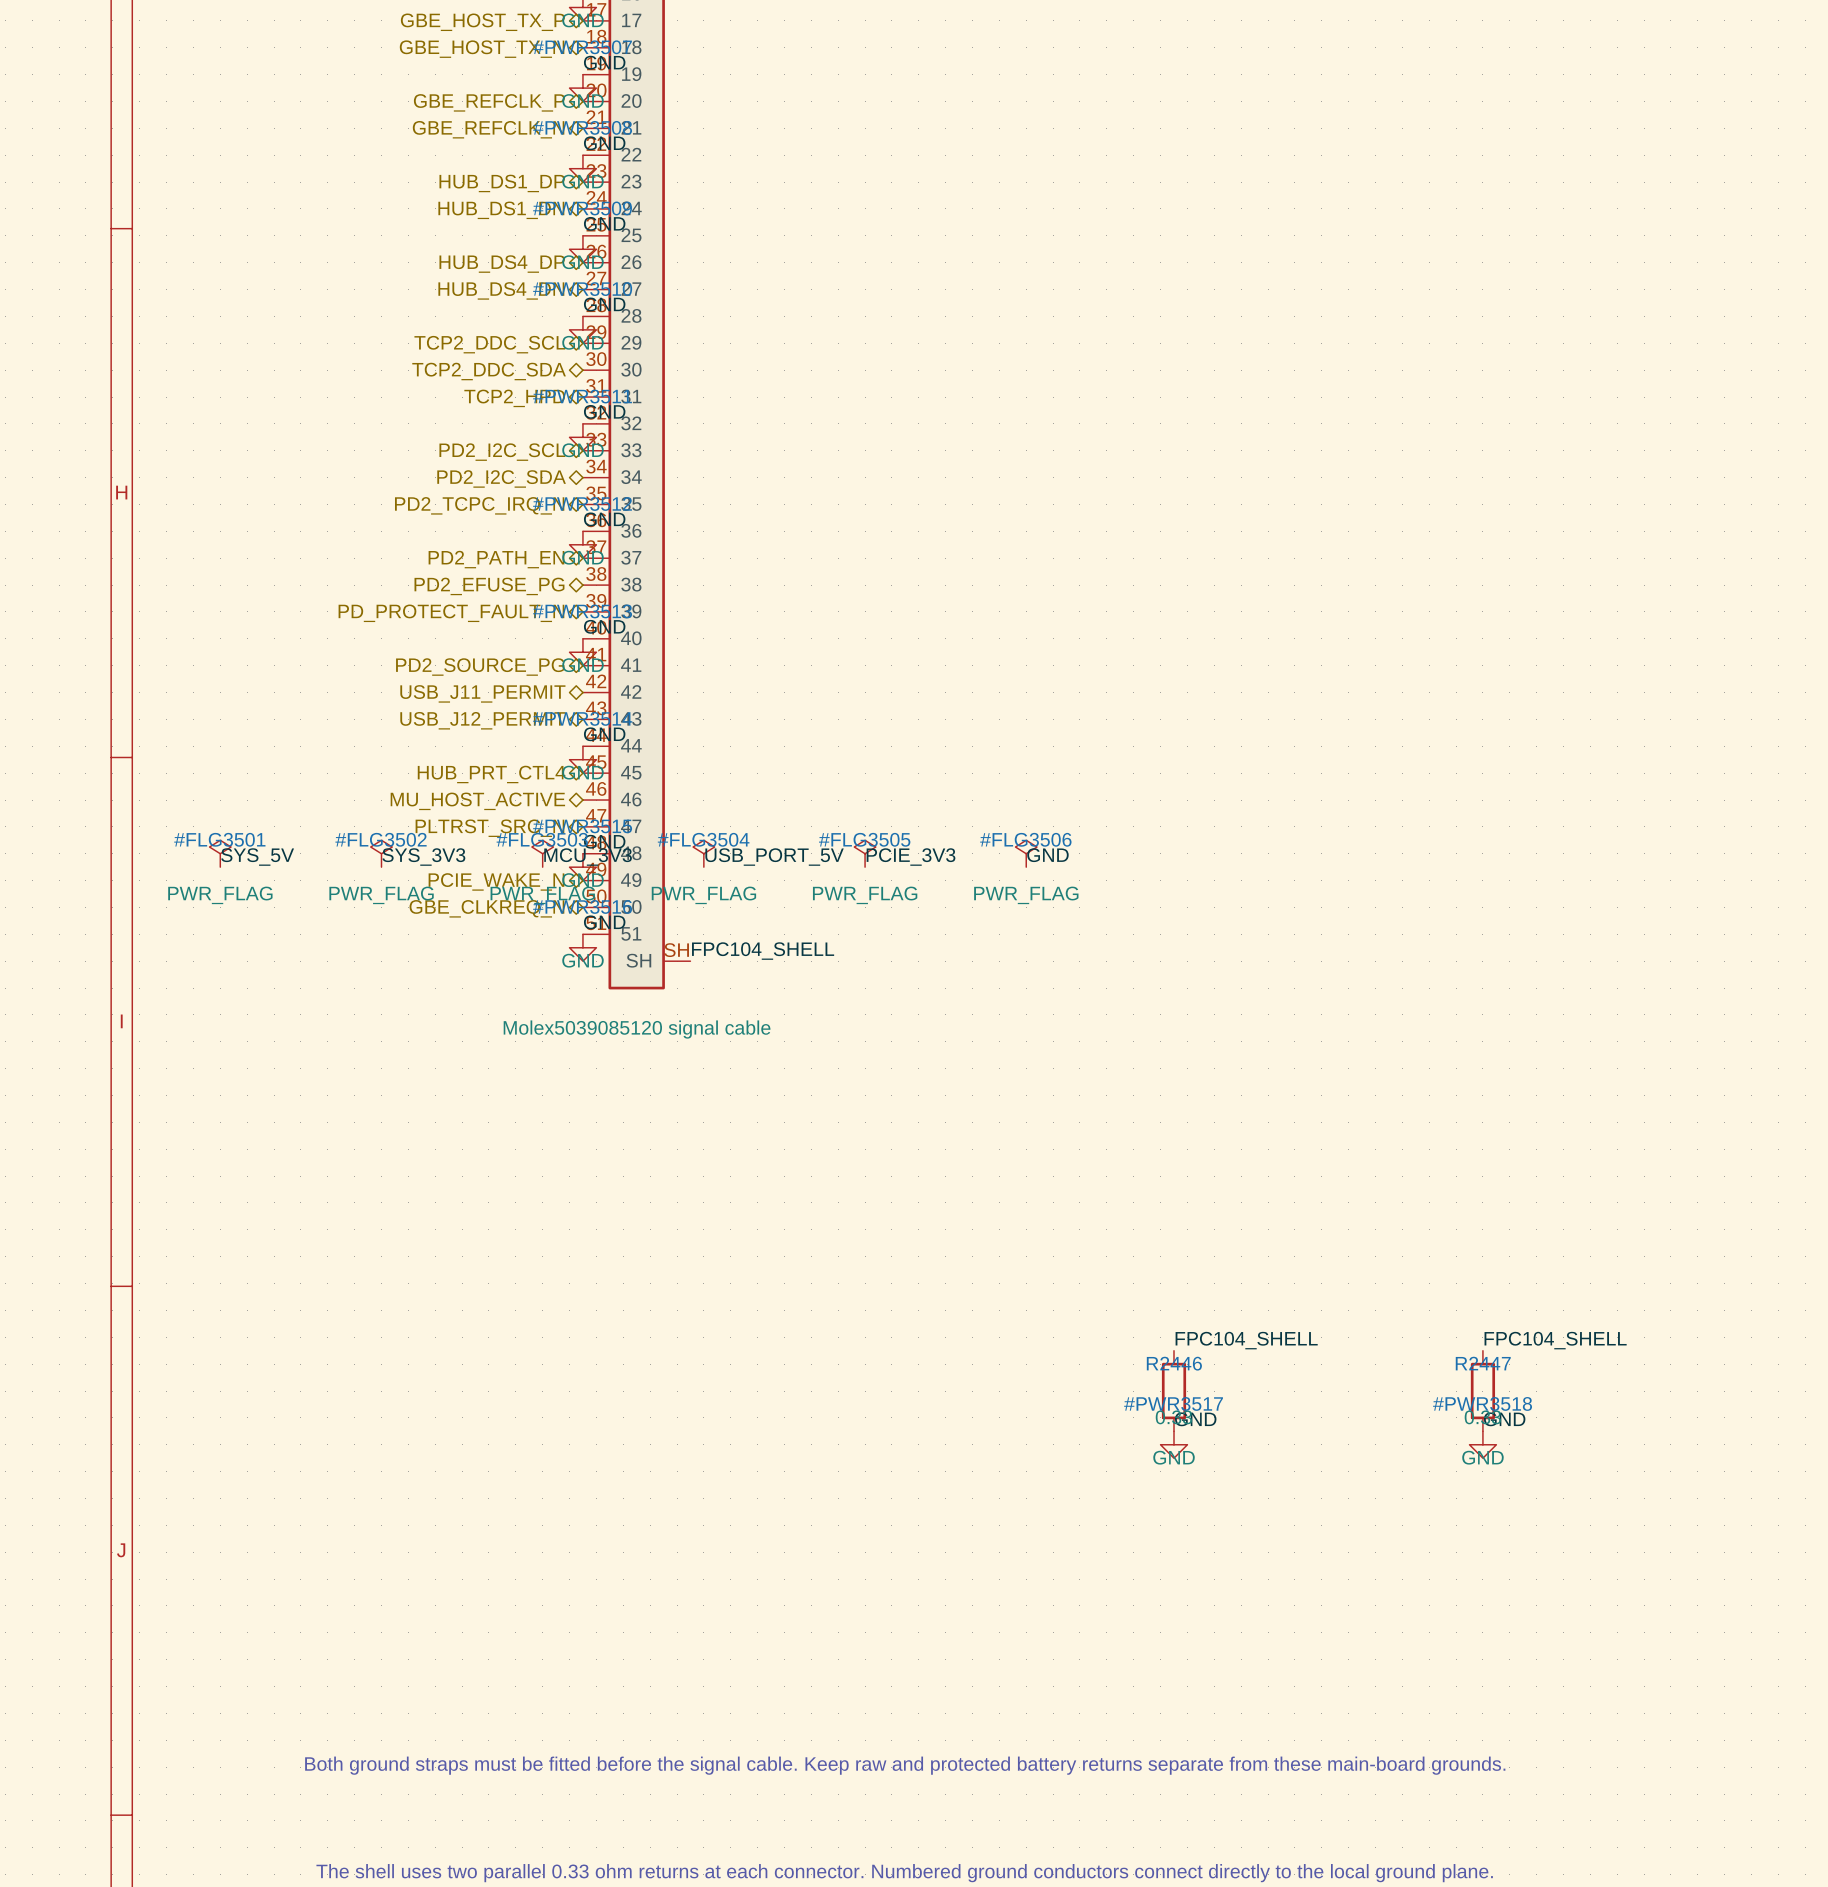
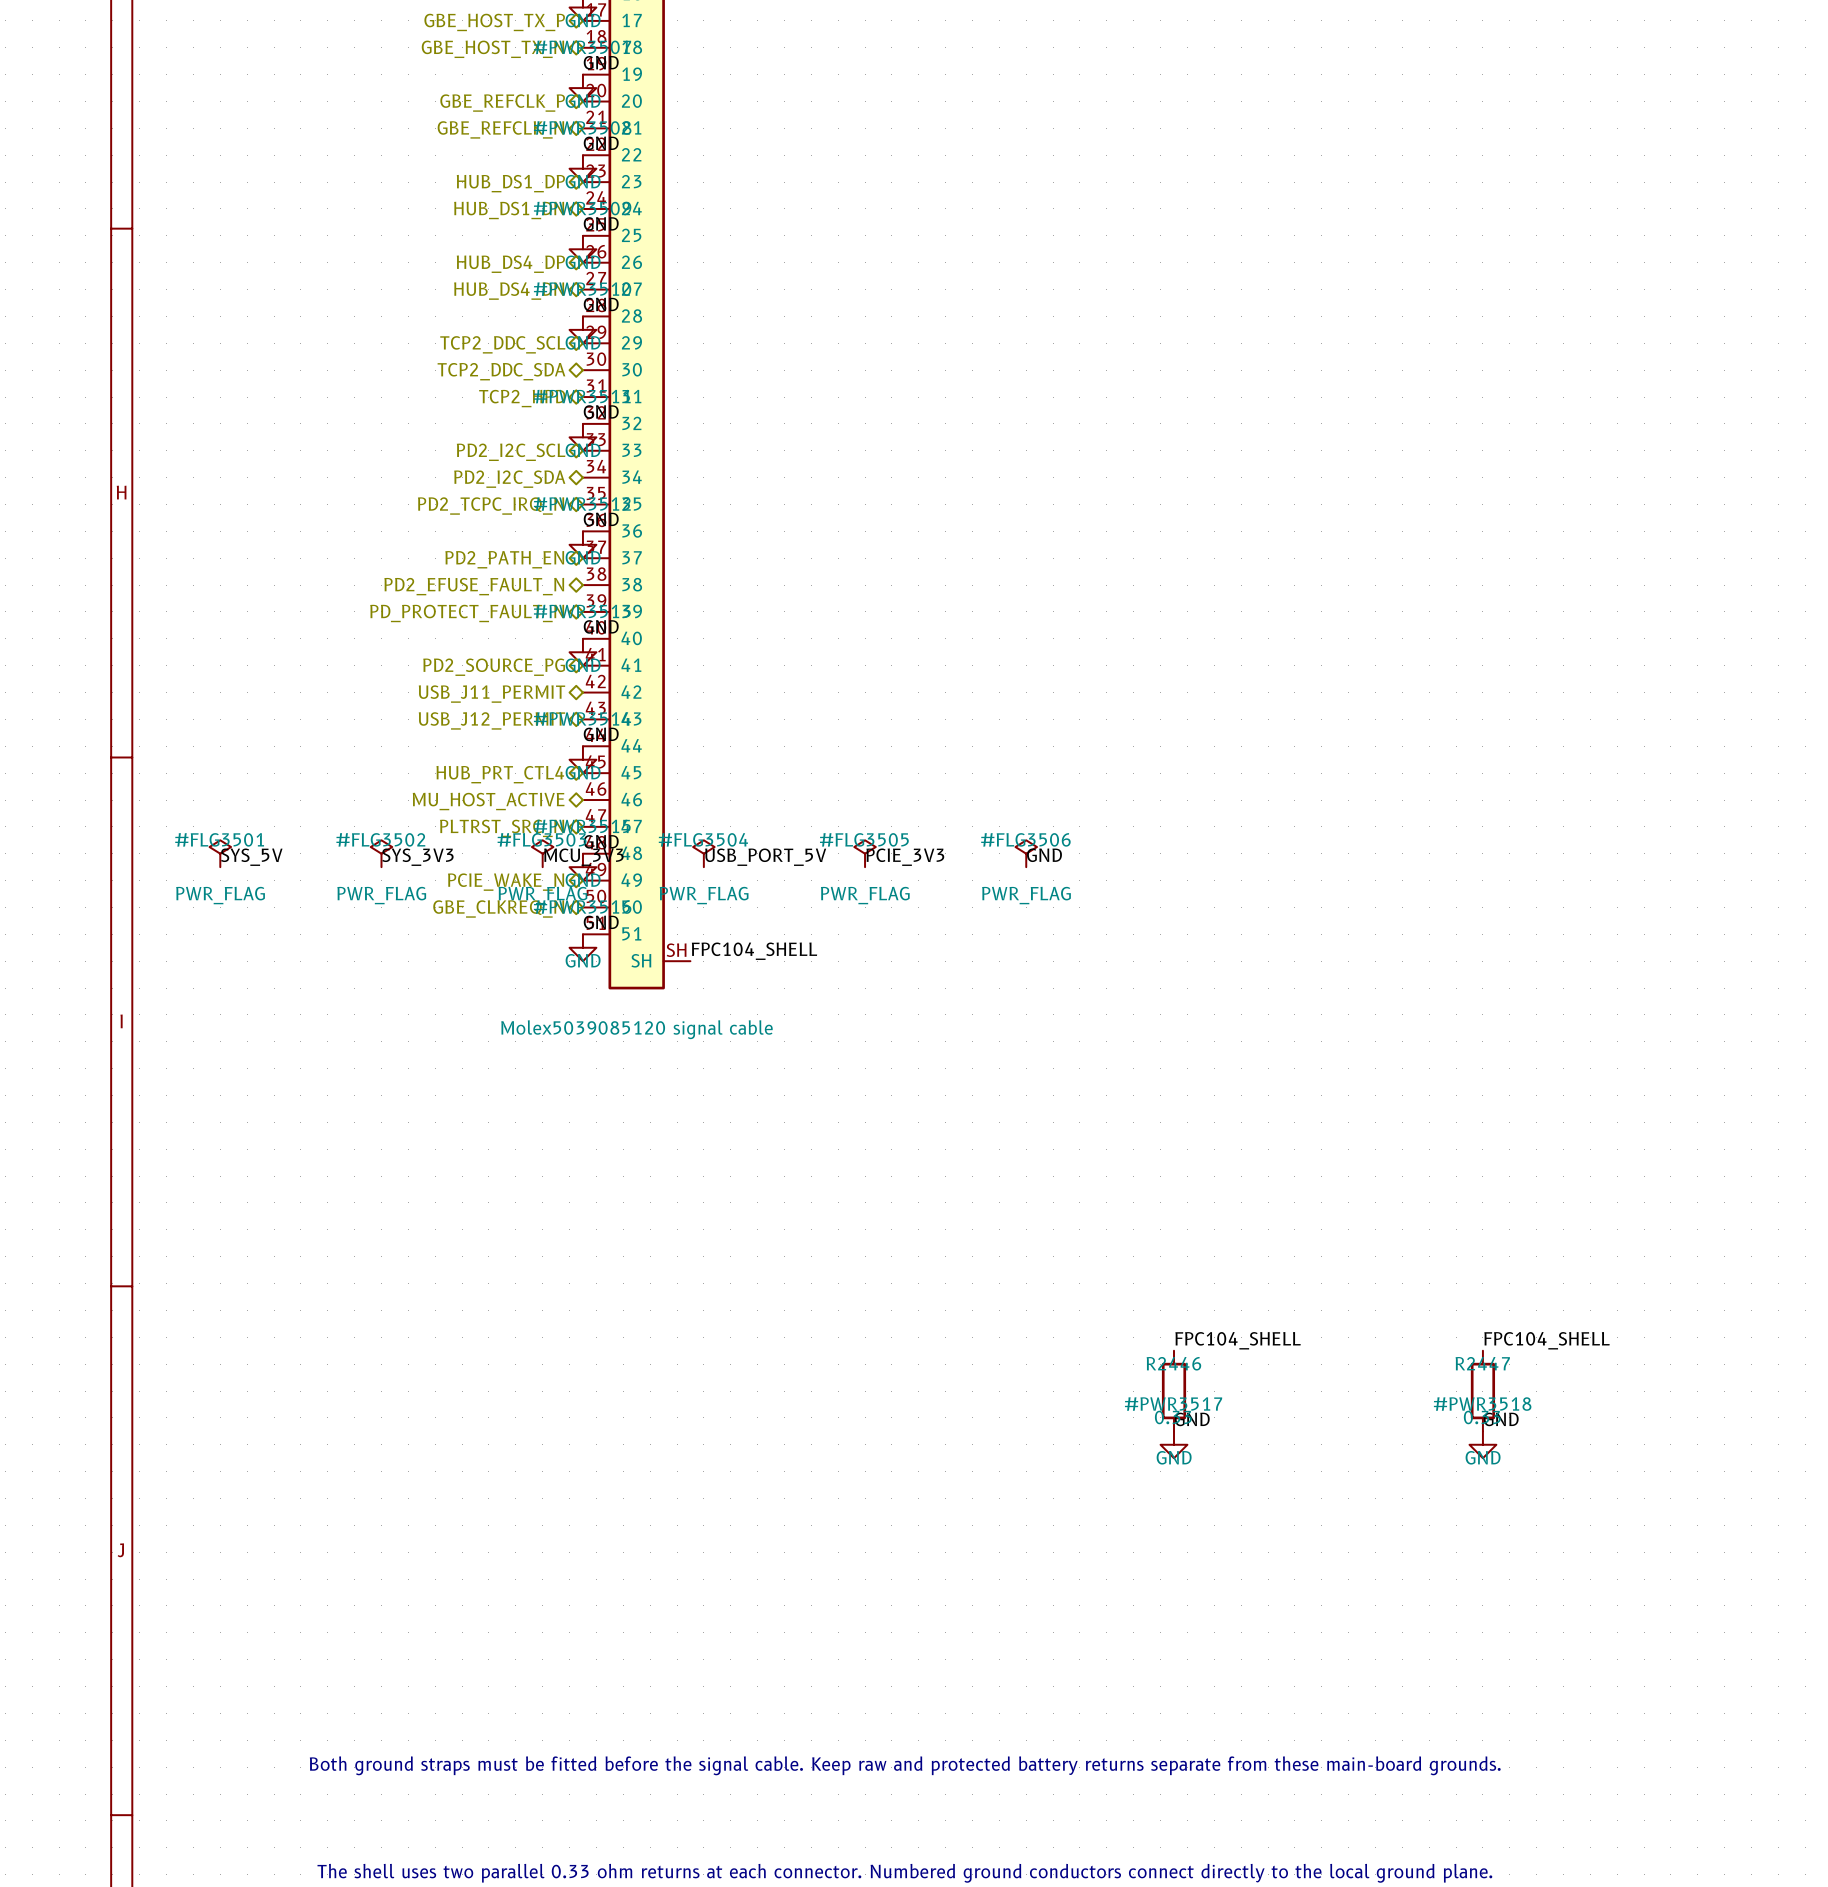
hierarchical label: PD2_EFUSE_PG (489, 586) -> PD2_EFUSE_FAULT_N (474, 586)

